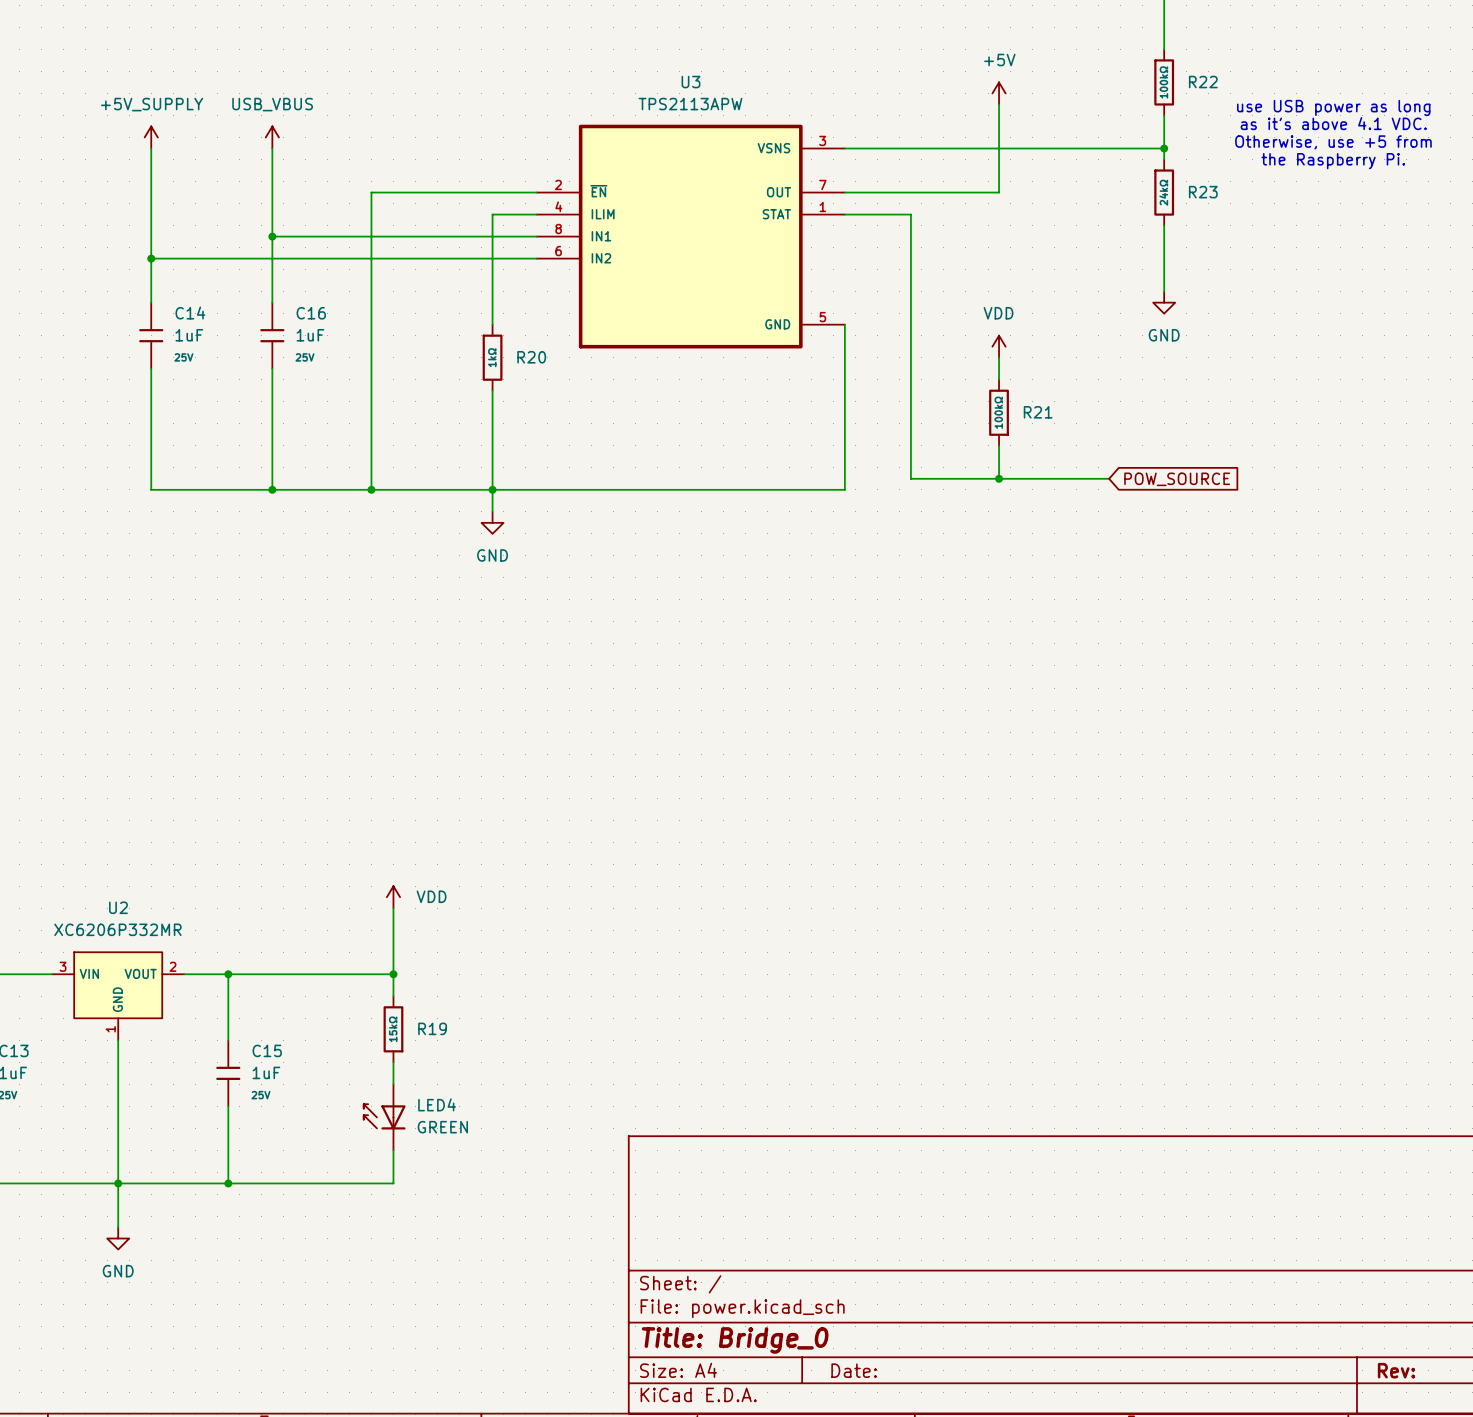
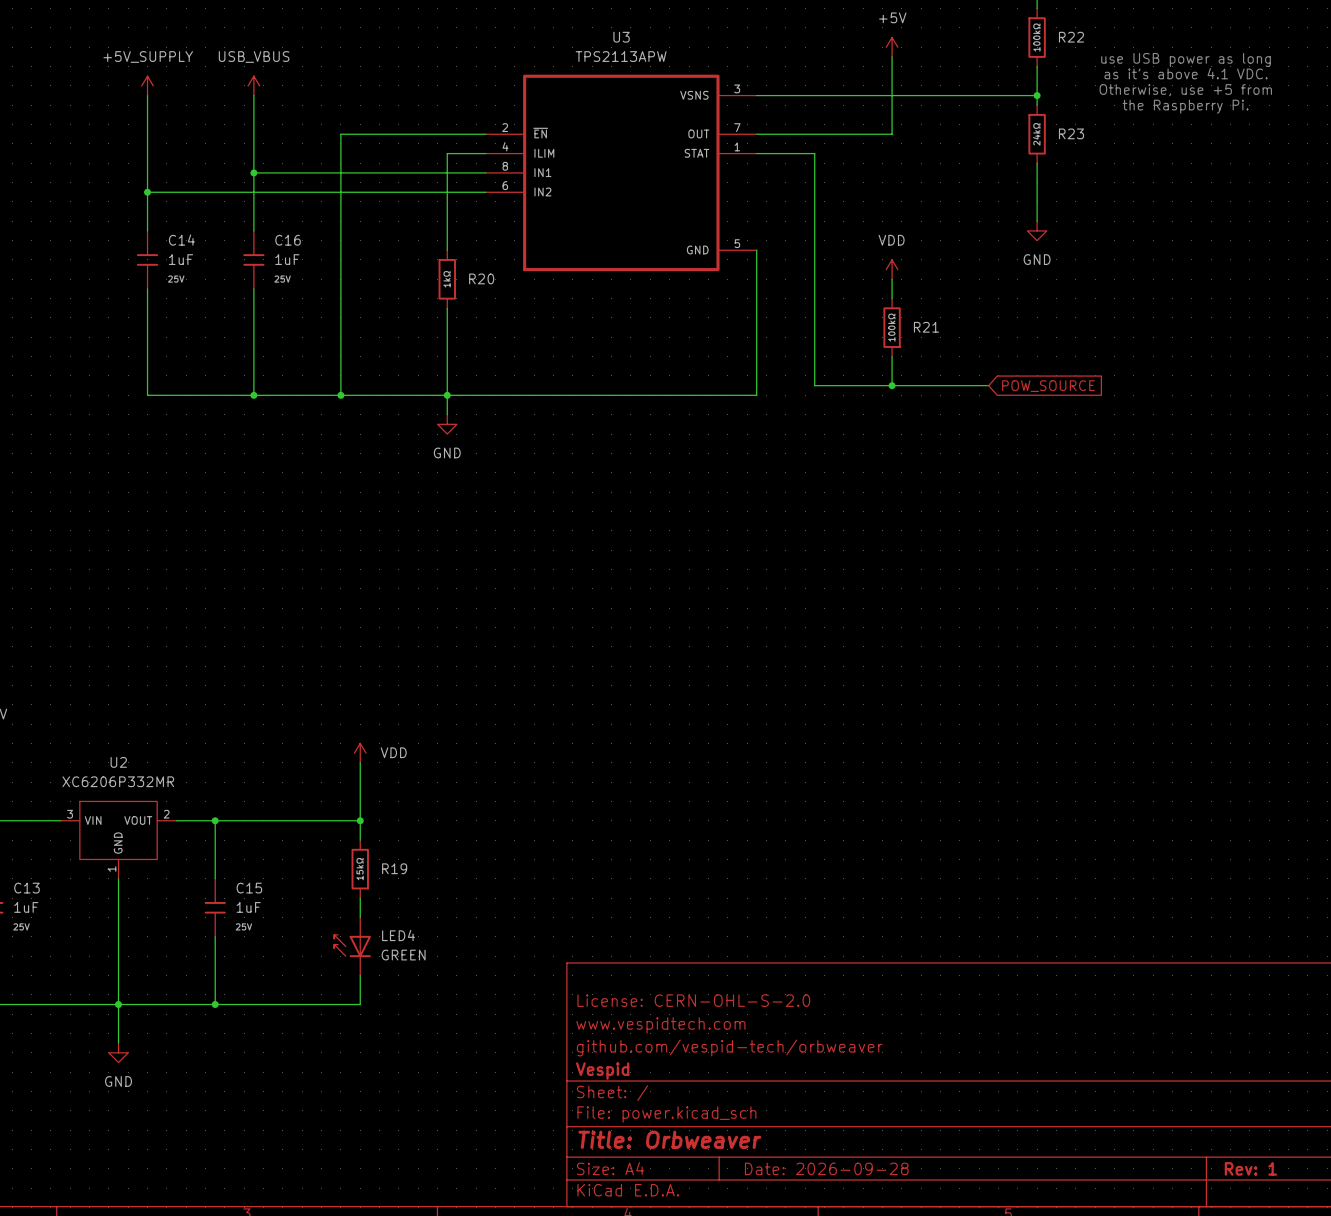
title block: none -> License: CERN-OHL-S-2.0 (693, 1000)
title block: none -> www.vespidtech.com (660, 1025)
title block: none -> github.com/vespid-tech/orbweaver (729, 1047)
title block: none -> Vespid (602, 1071)
title block: Title: Bridge_0 (735, 1340) -> Title: Orbweaver (669, 1139)
title block: Date: (854, 1370) -> Date: 2026-09-28 (826, 1168)
title block: Rev: (1396, 1370) -> Rev: 1 (1250, 1168)

